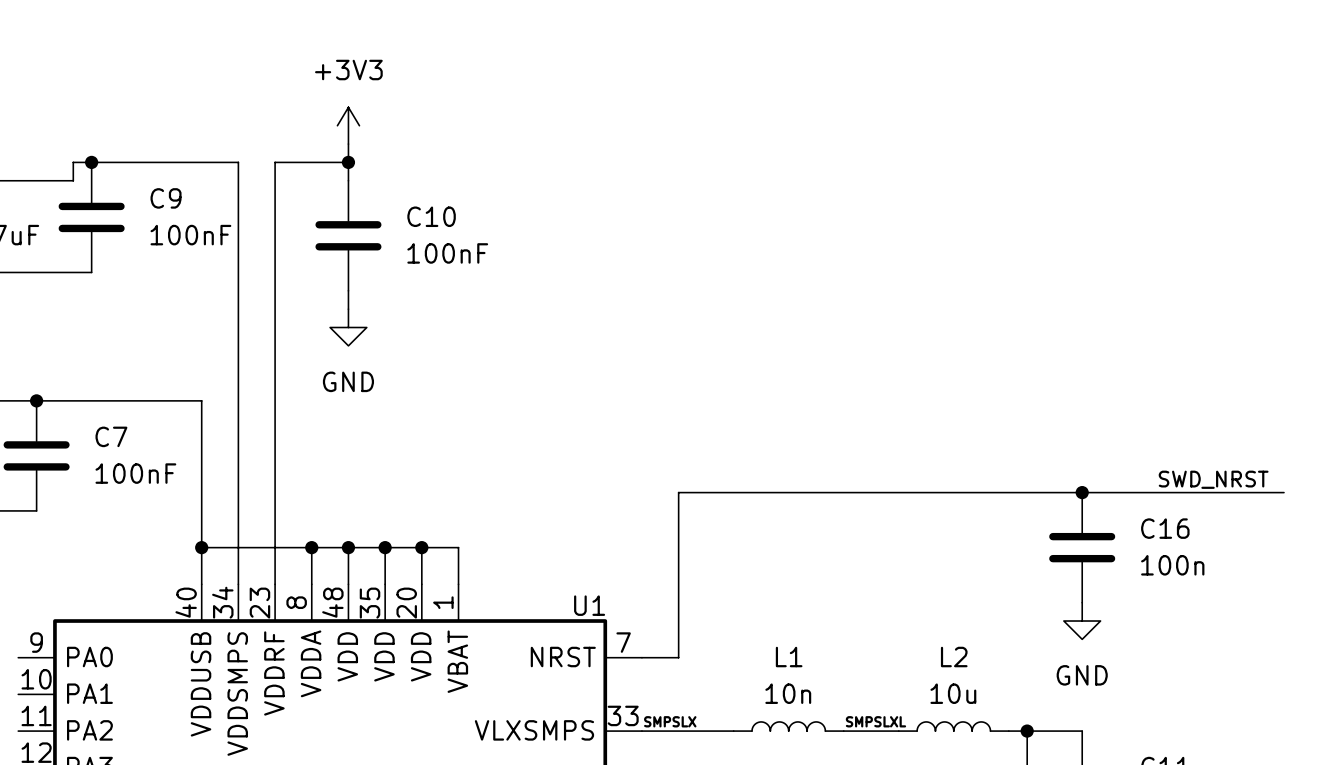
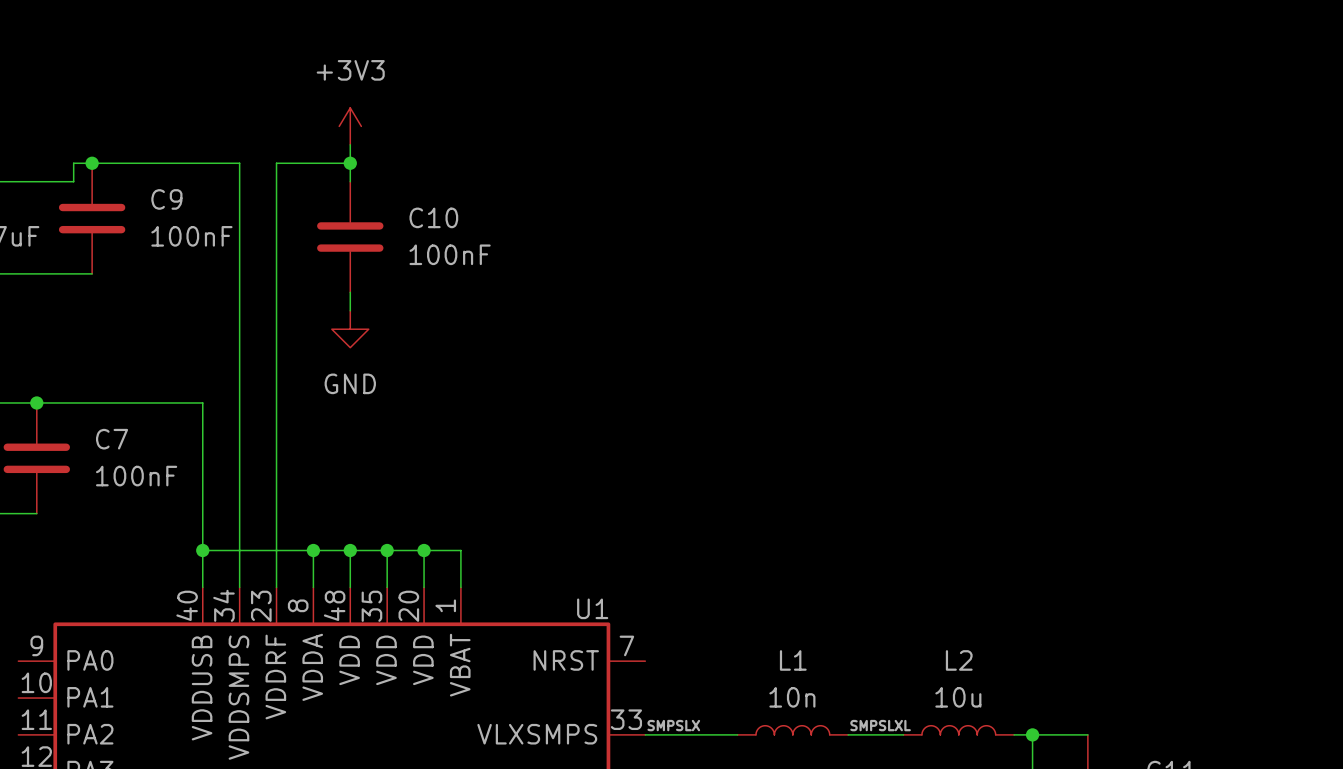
label: SWD_NRST (1213, 479) -> none
junction: (1082, 492) -> none
wire: (1283, 492) (678, 492) (678, 657) (641, 657) -> none
C16: 100n (1082, 547) -> none
power symbol: GND (1082, 621) -> none

